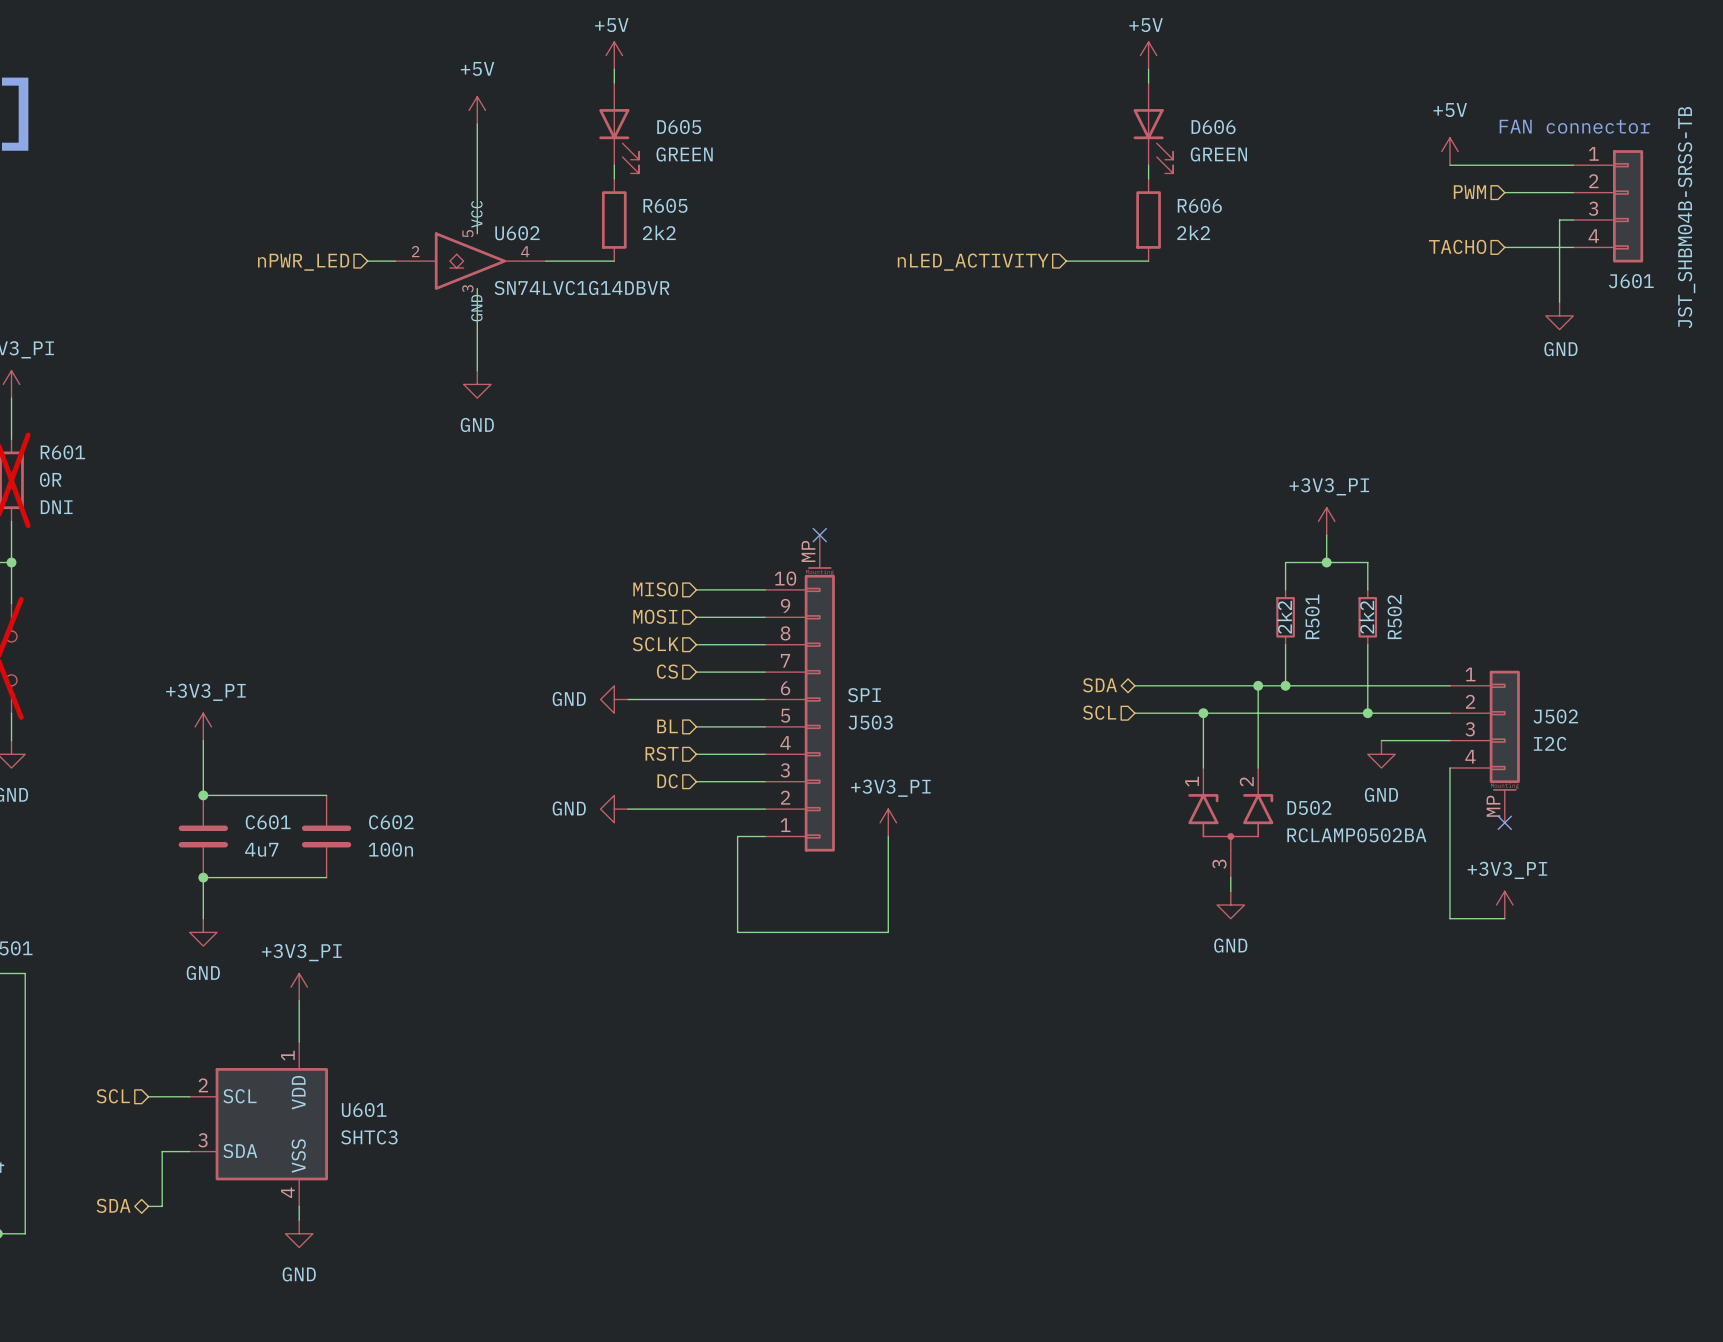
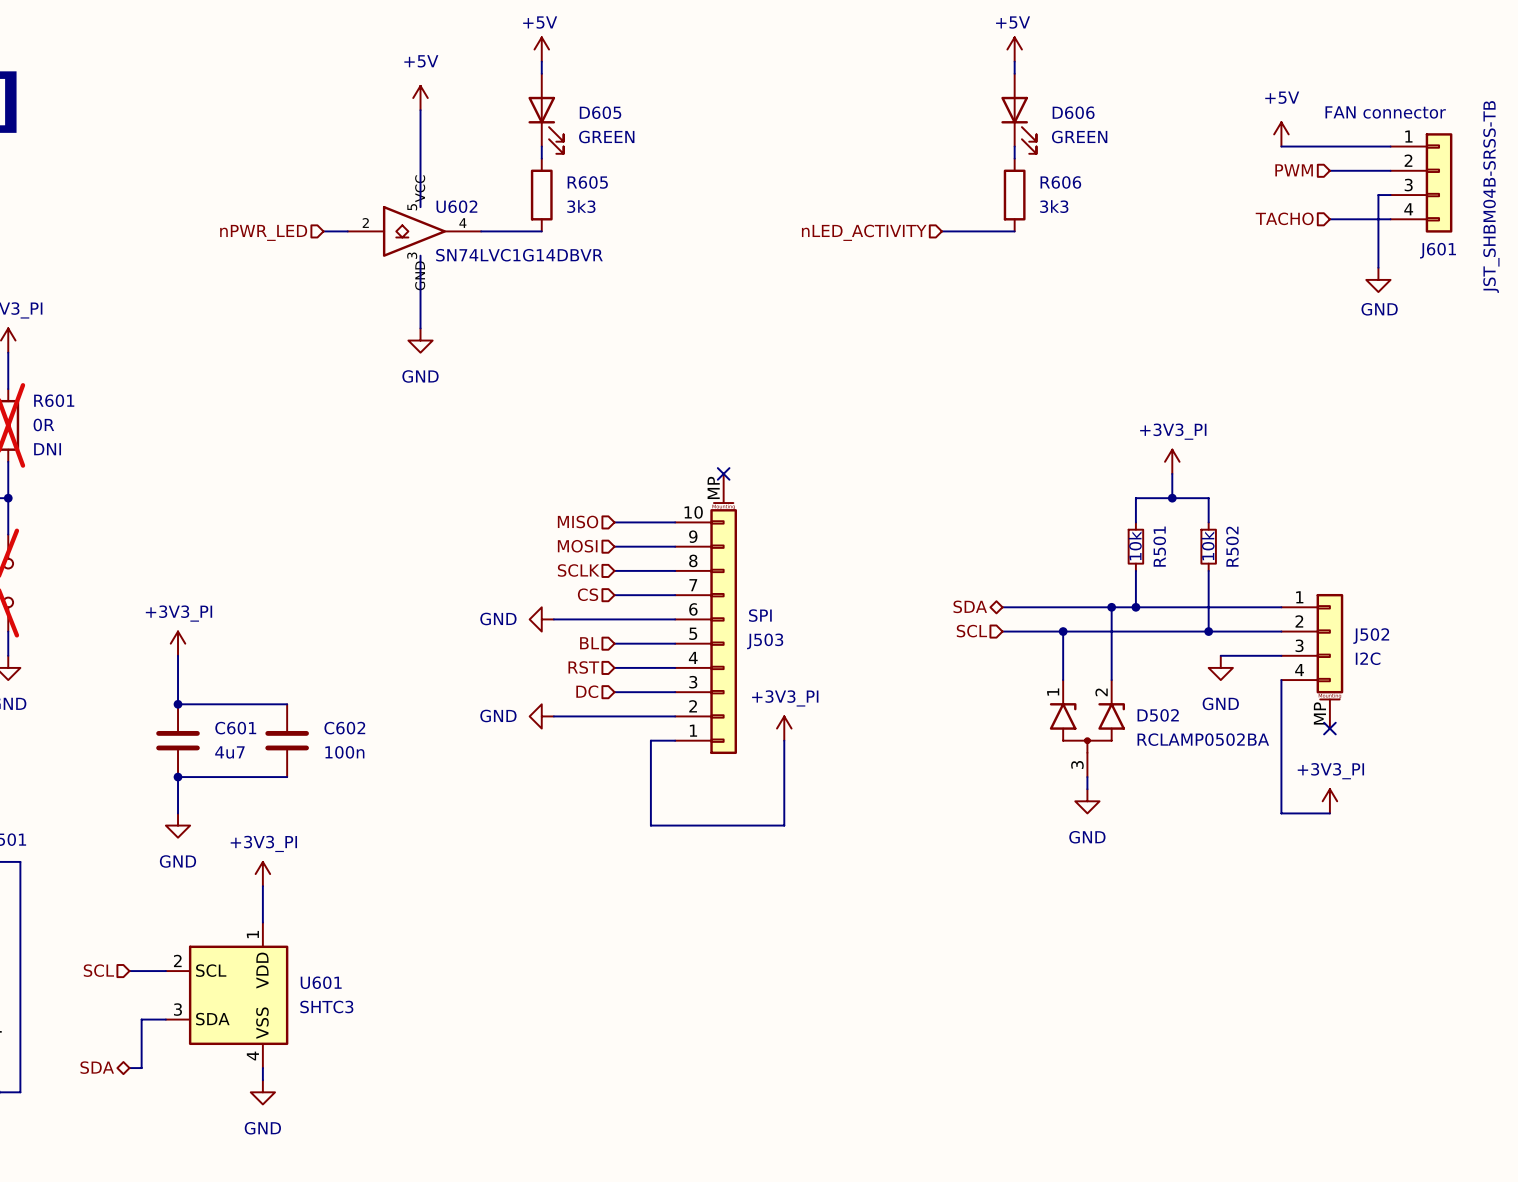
R605 value: 2k2 (659, 232) -> 3k3 (581, 206)
R606 value: 2k2 (1193, 232) -> 3k3 (1054, 206)
R501 value: 2k2 (1284, 617) -> 10k (1135, 545)
R502 value: 2k2 (1366, 617) -> 10k (1208, 545)

